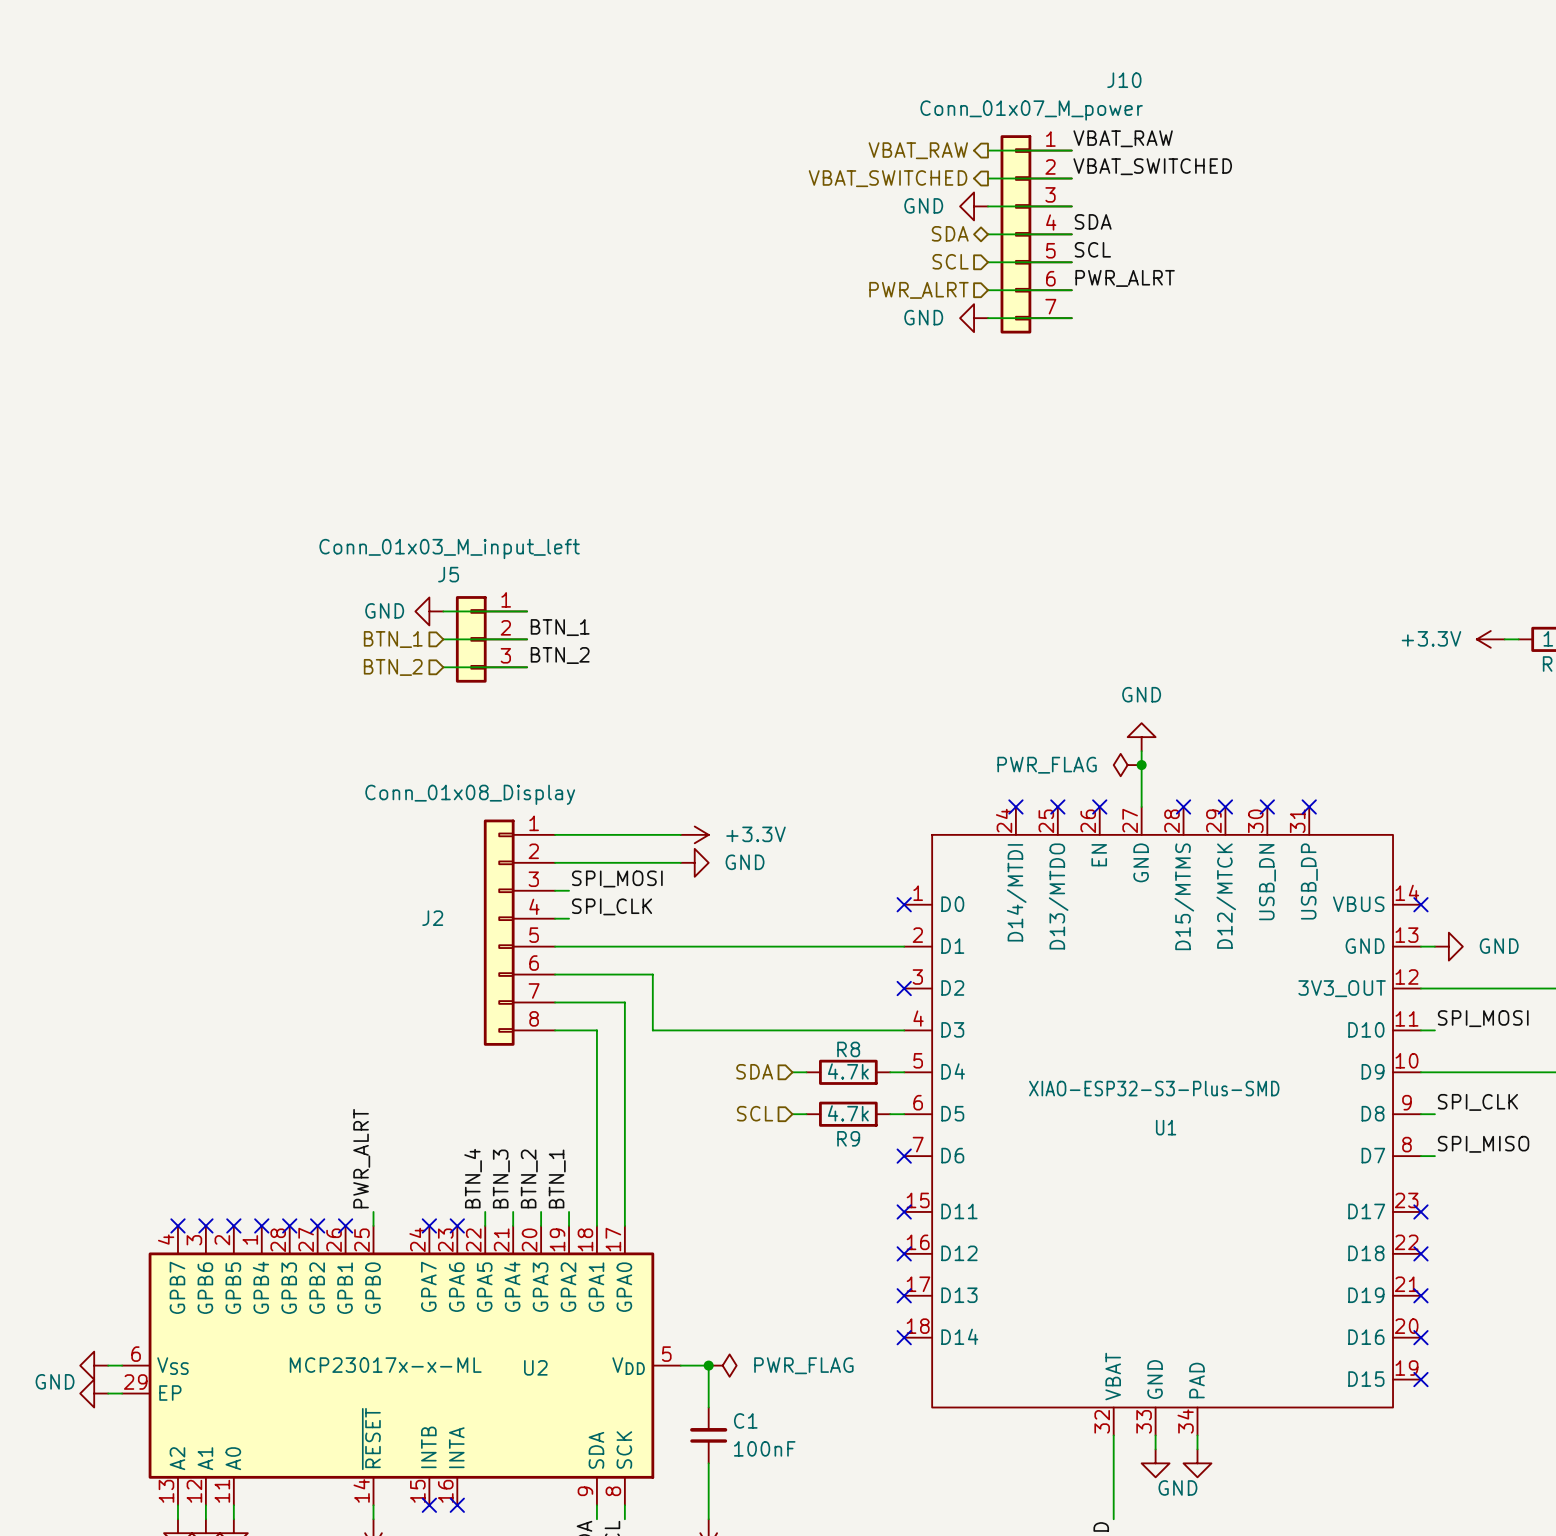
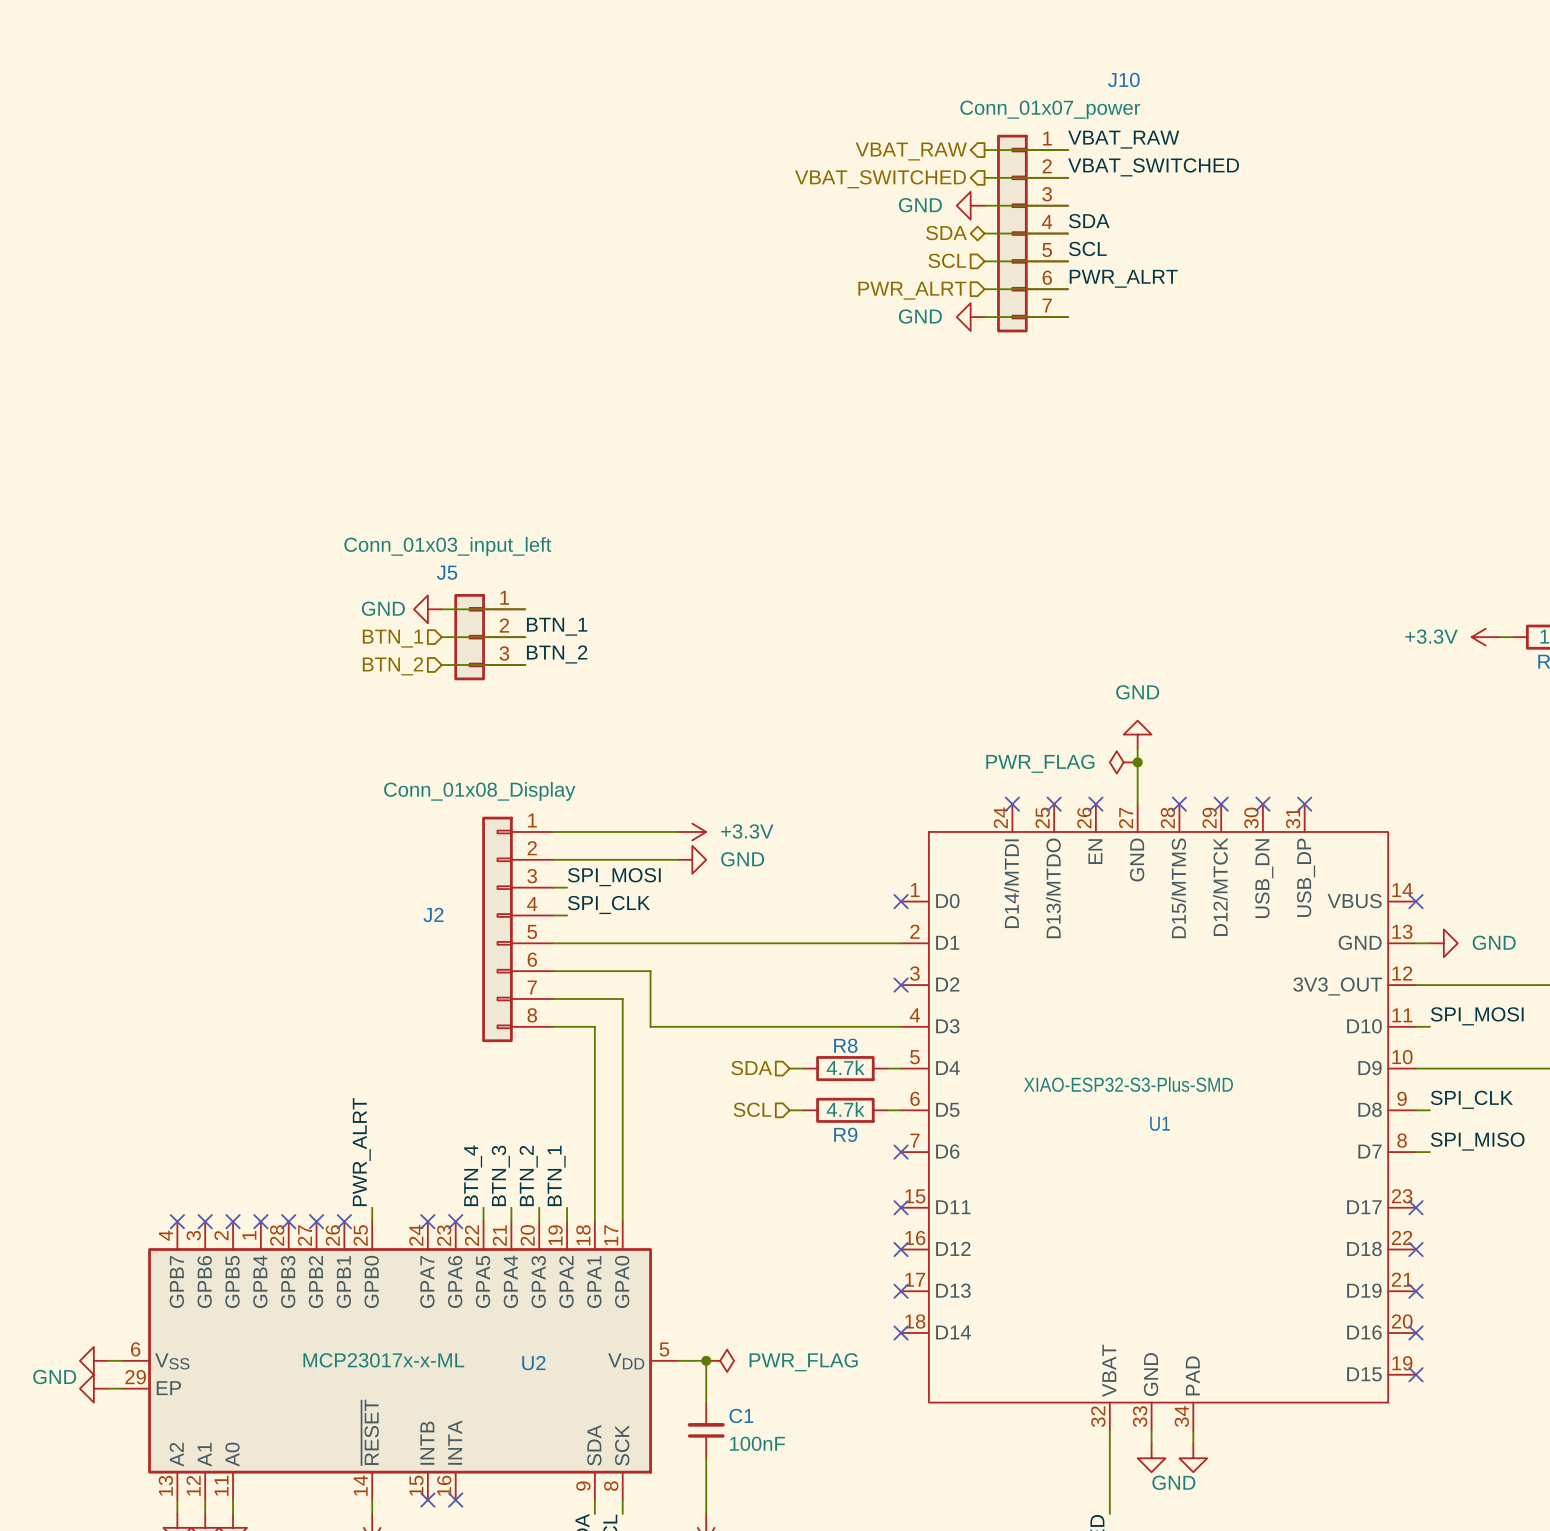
J10 value: Conn_01x07_M_power (1031, 110) -> Conn_01x07_power (1050, 109)
J5 value: Conn_01x03_M_input_left (449, 549) -> Conn_01x03_input_left (447, 546)

